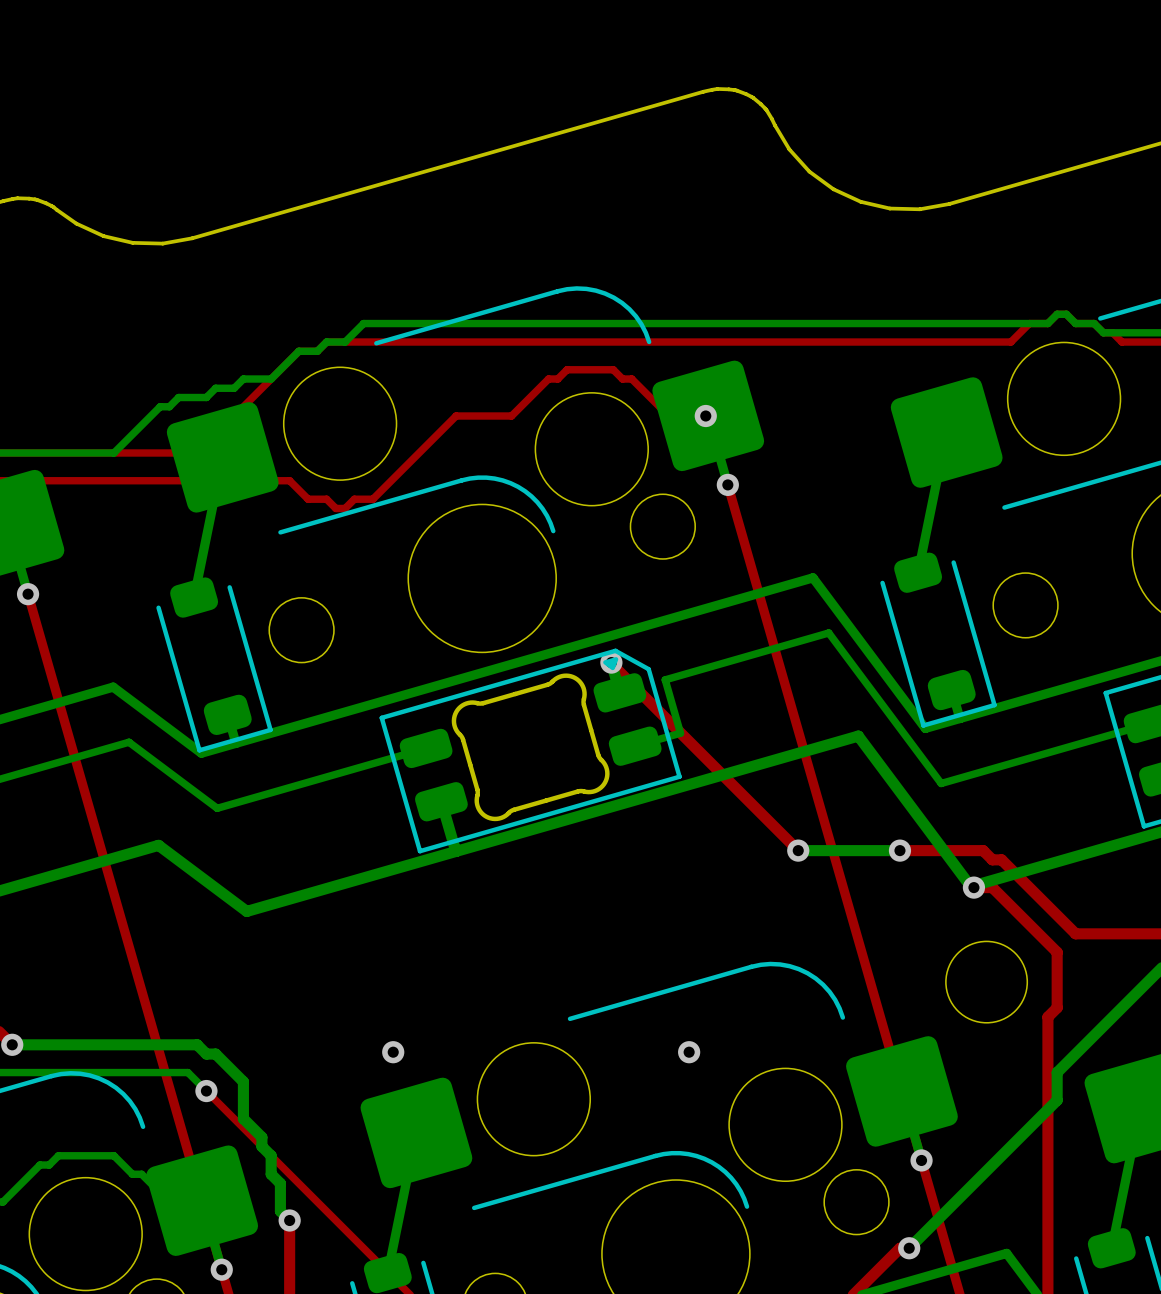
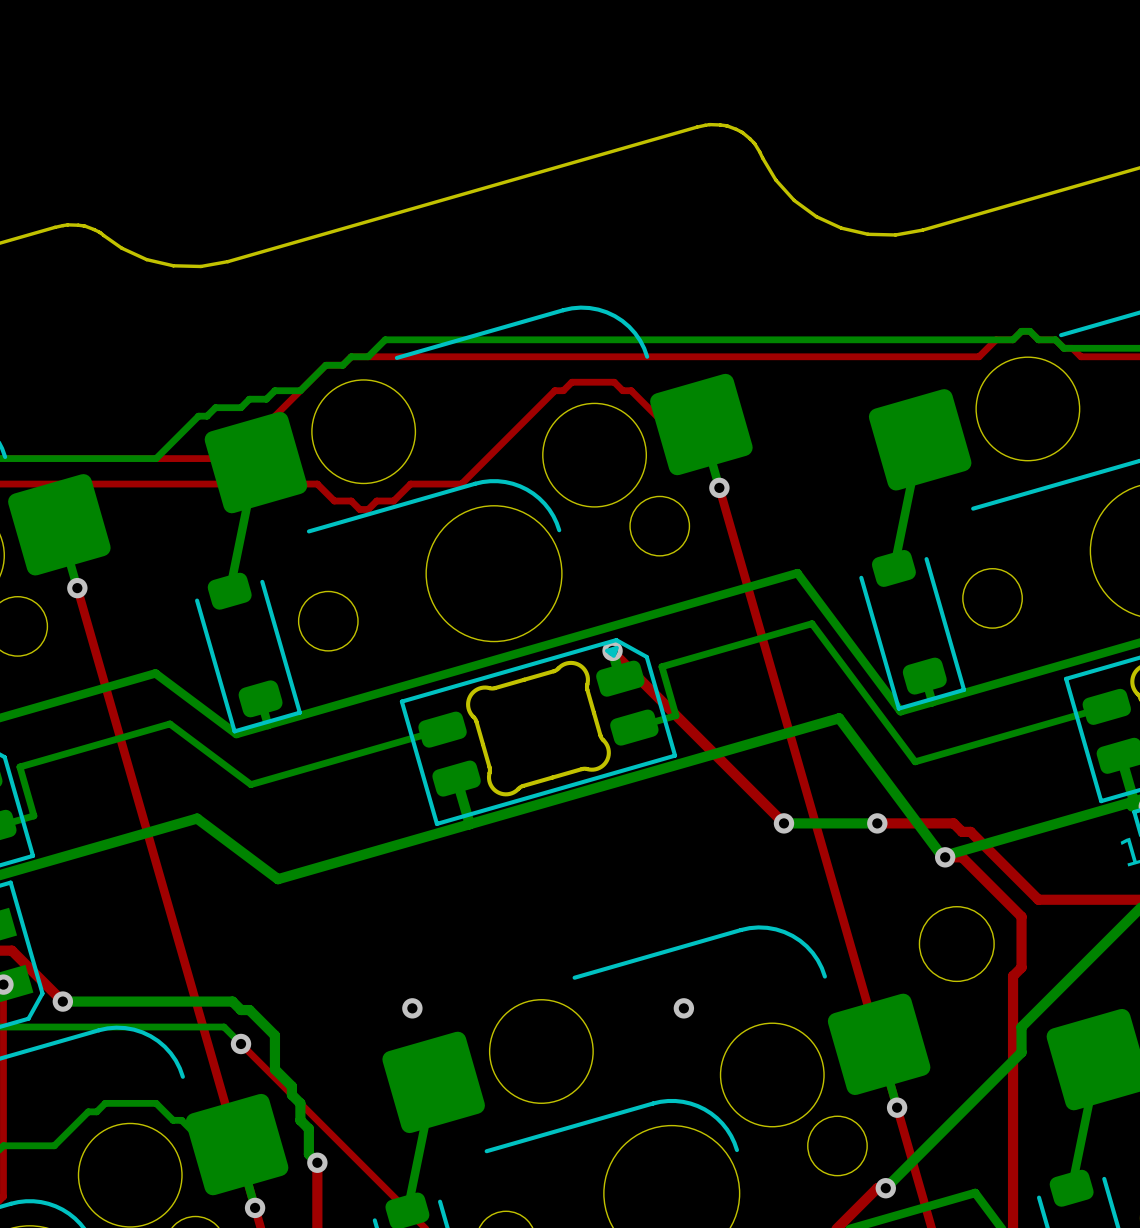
top track: (511, 416) (456, 416) (391, 480) -> (520, 424) (461, 484) (410, 484)
via: (705, 416) -> none

